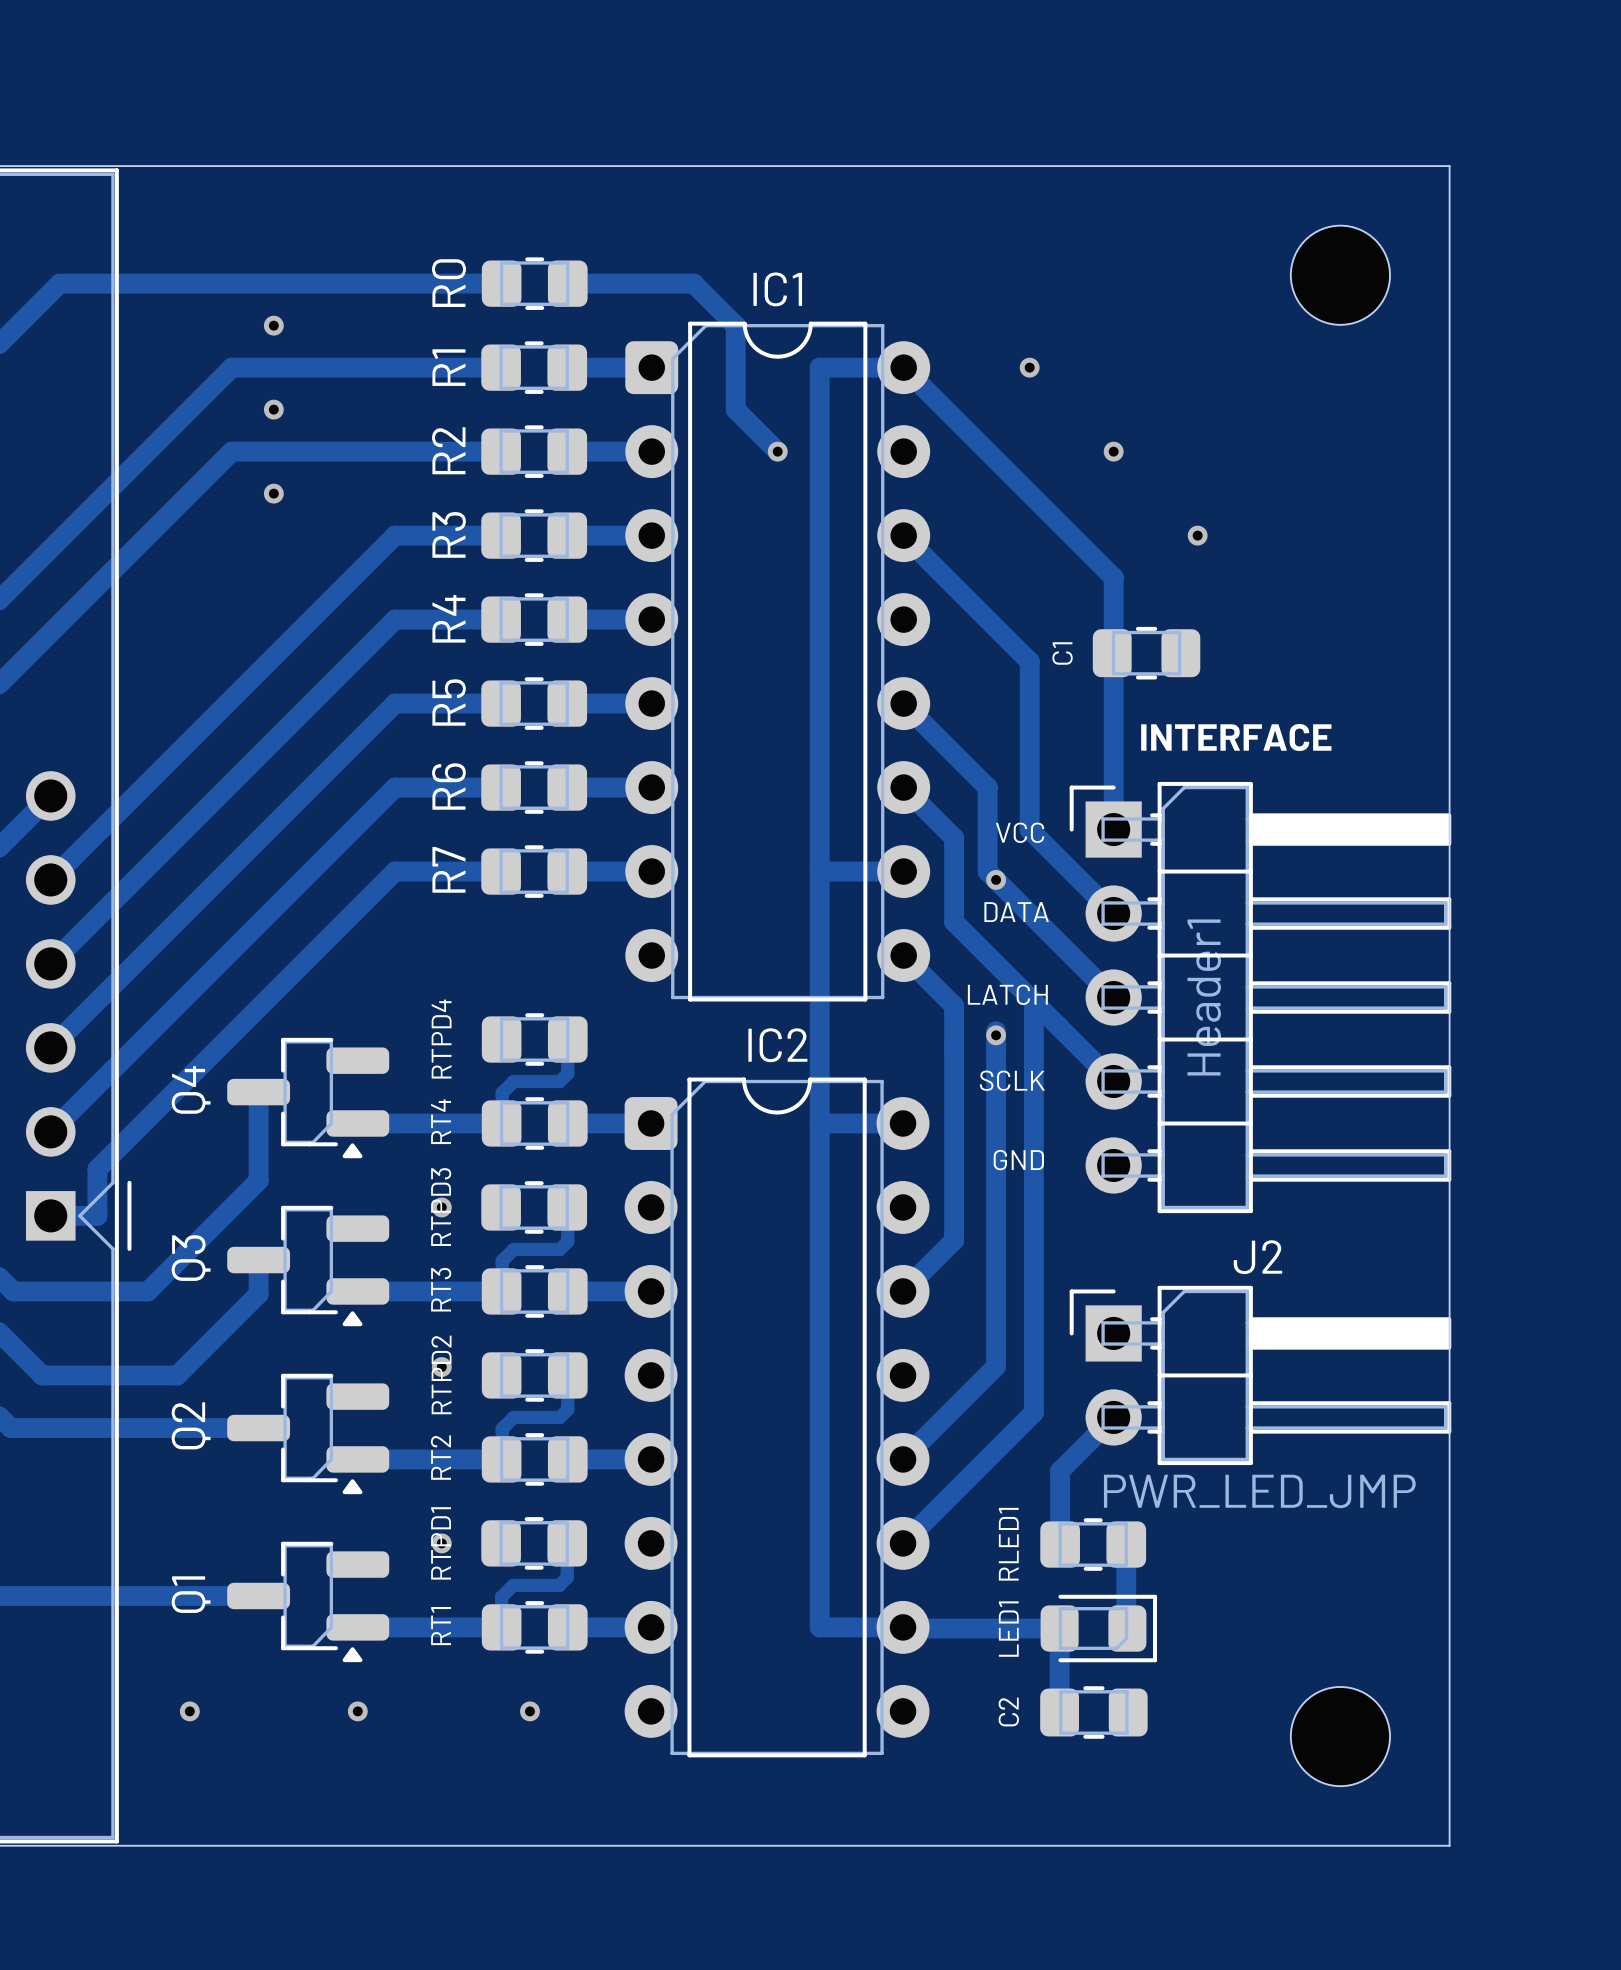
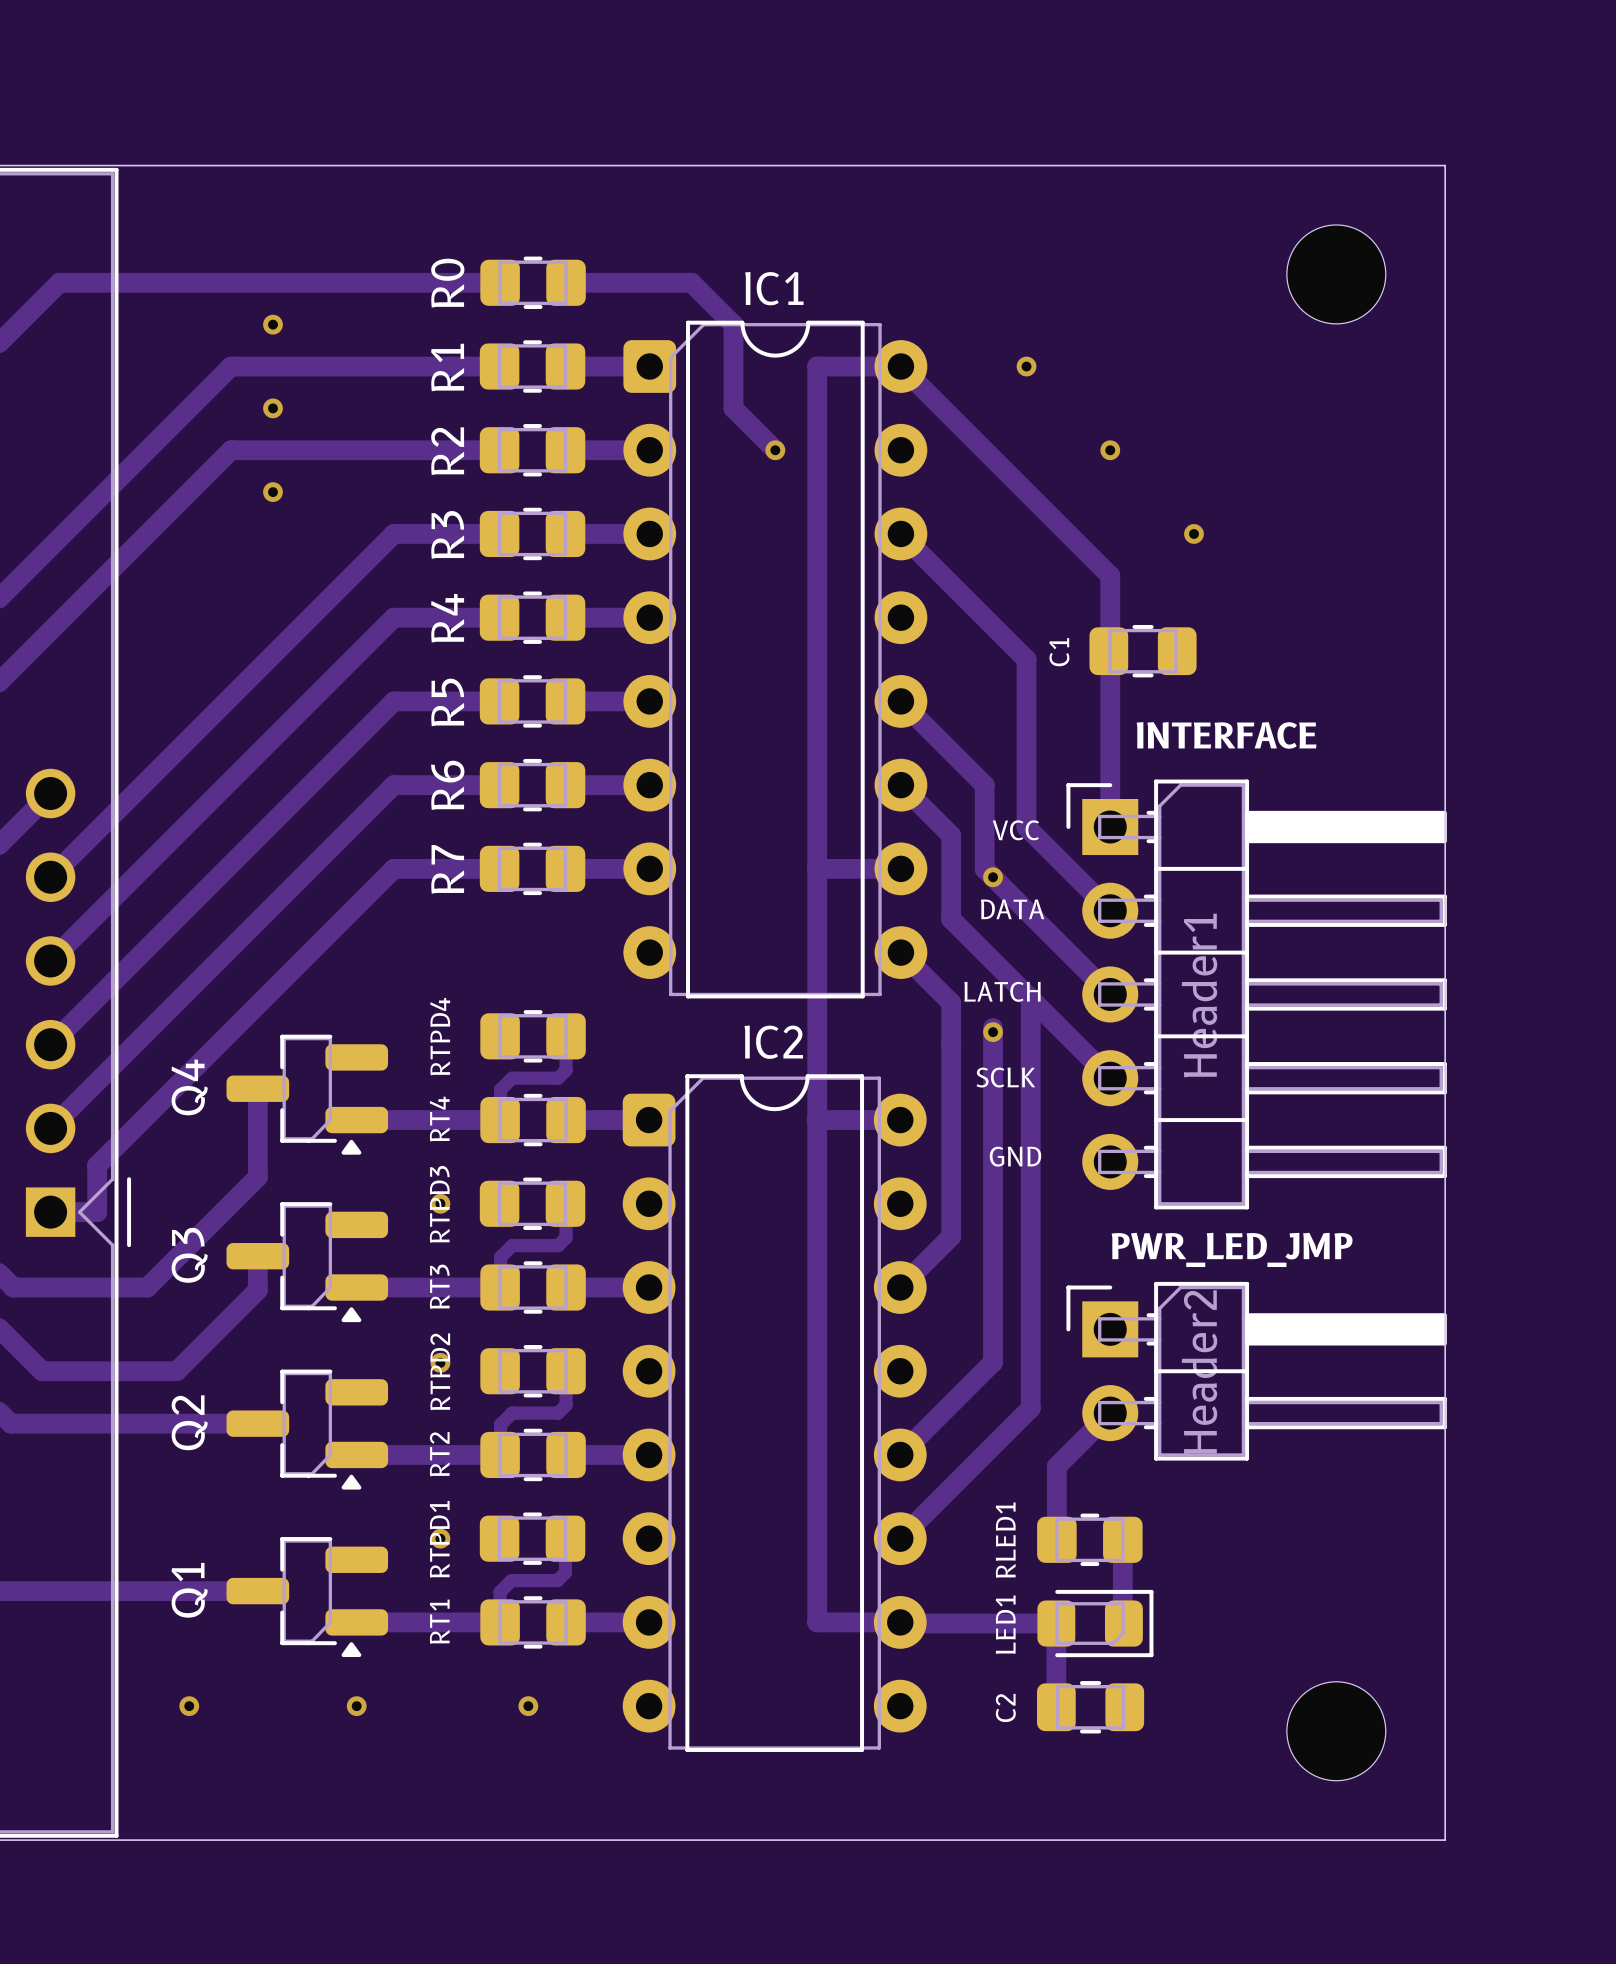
text: none -> PWR_LED_JMP (1232, 1249)
J2 name: J2 (1257, 1257) -> Header2 (1199, 1372)
J2 value: PWR_LED_JMP (1259, 1491) -> none

